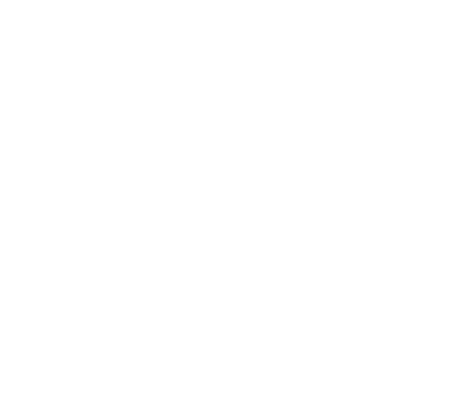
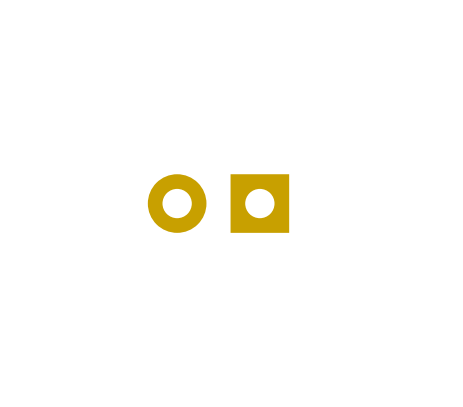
part: none -> (218, 203)

